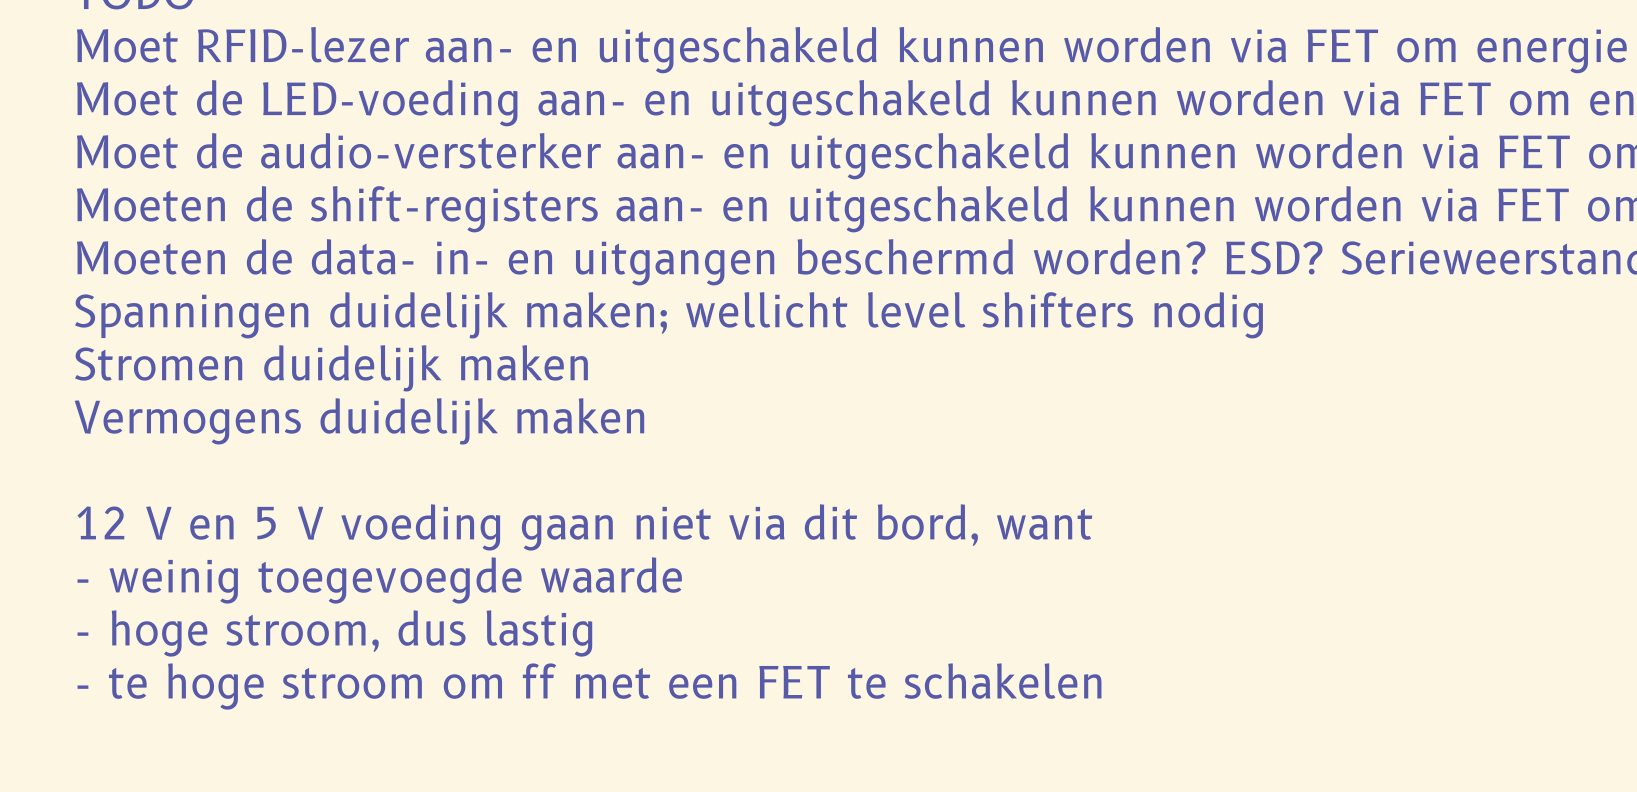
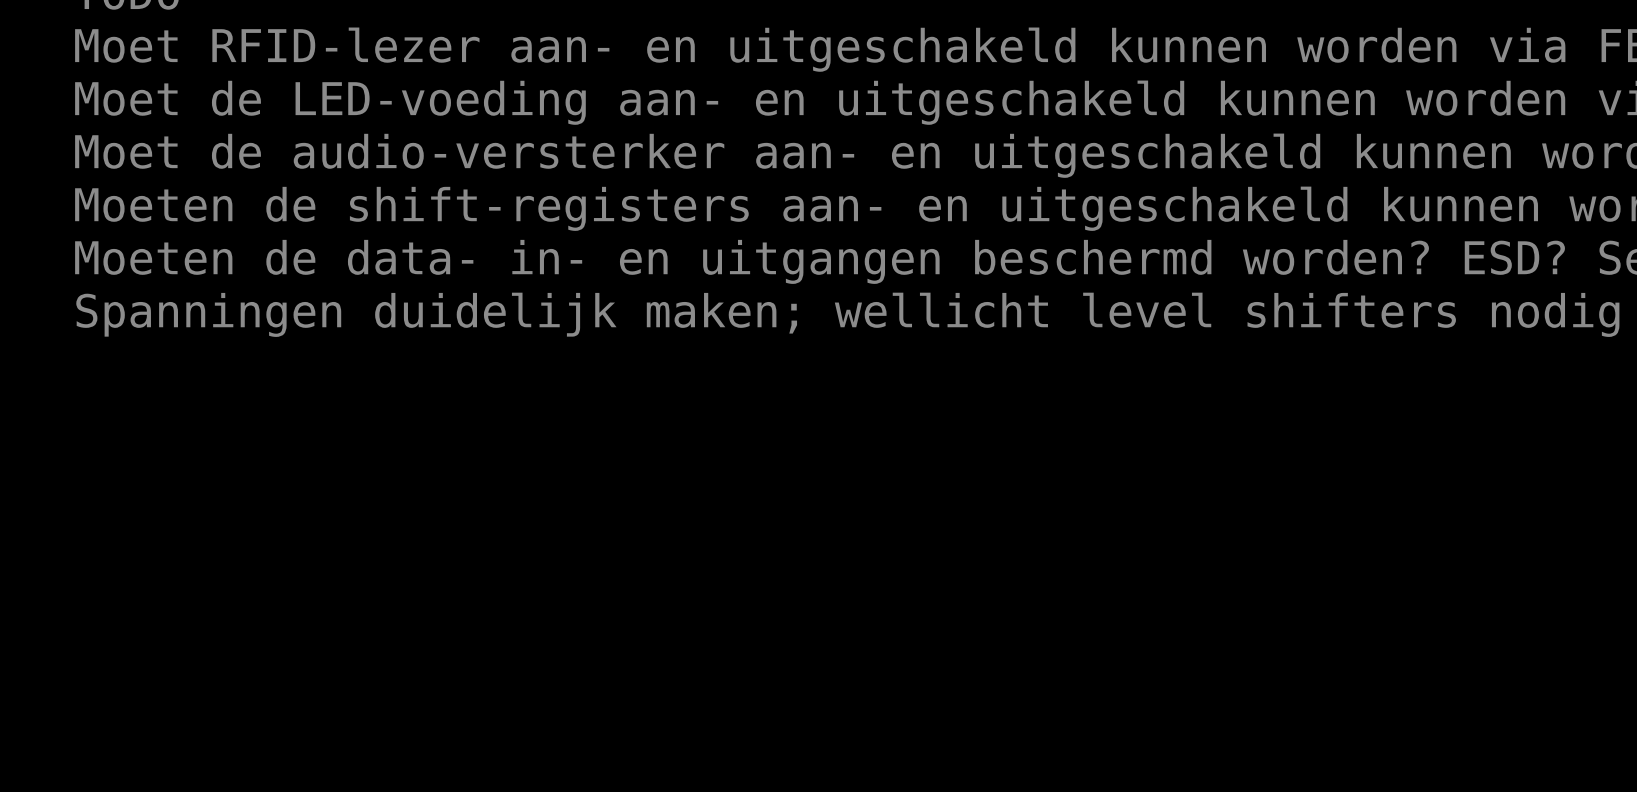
text: Stromen duidelijk maken (331, 368) -> none
text: Vermogens duidelijk maken (359, 421) -> none
text: 12 V en 5 V voeding gaan niet via dit bord, want (584, 527) -> none
text: - weinig toegevoegde waarde (379, 580) -> none
text: - hoge stroom, dus lastig (334, 633) -> none
text: - te hoge stroom om ff met een FET te schakelen (589, 686) -> none

